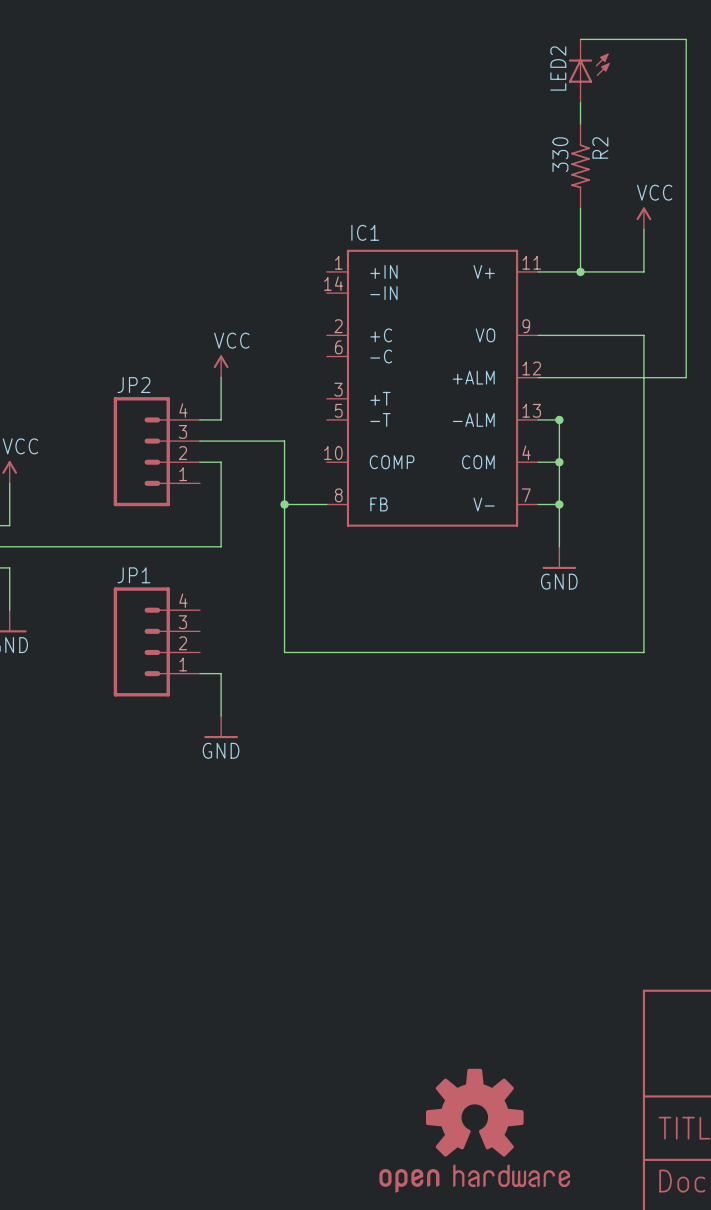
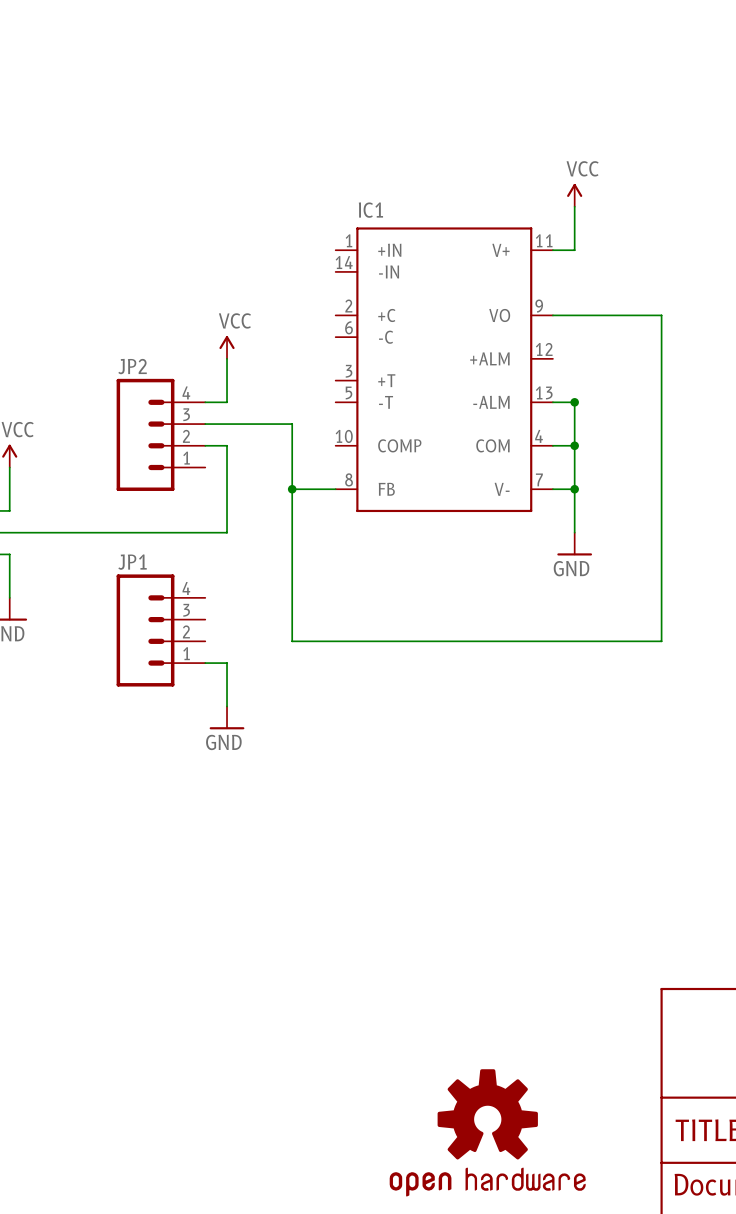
wire: (580, 39) (686, 39) (686, 377) (538, 377) -> none
LED2: (589, 71) -> none
wire: (580, 102) (580, 123) -> none
R2: 330 (580, 166) -> none
wire: (580, 208) (580, 271) -> none
power symbol position: VCC (643, 218) -> VCC (574, 195)
wire: (643, 229) (643, 271) (559, 271) -> (574, 206) (574, 250)
junction: (580, 271) -> none

